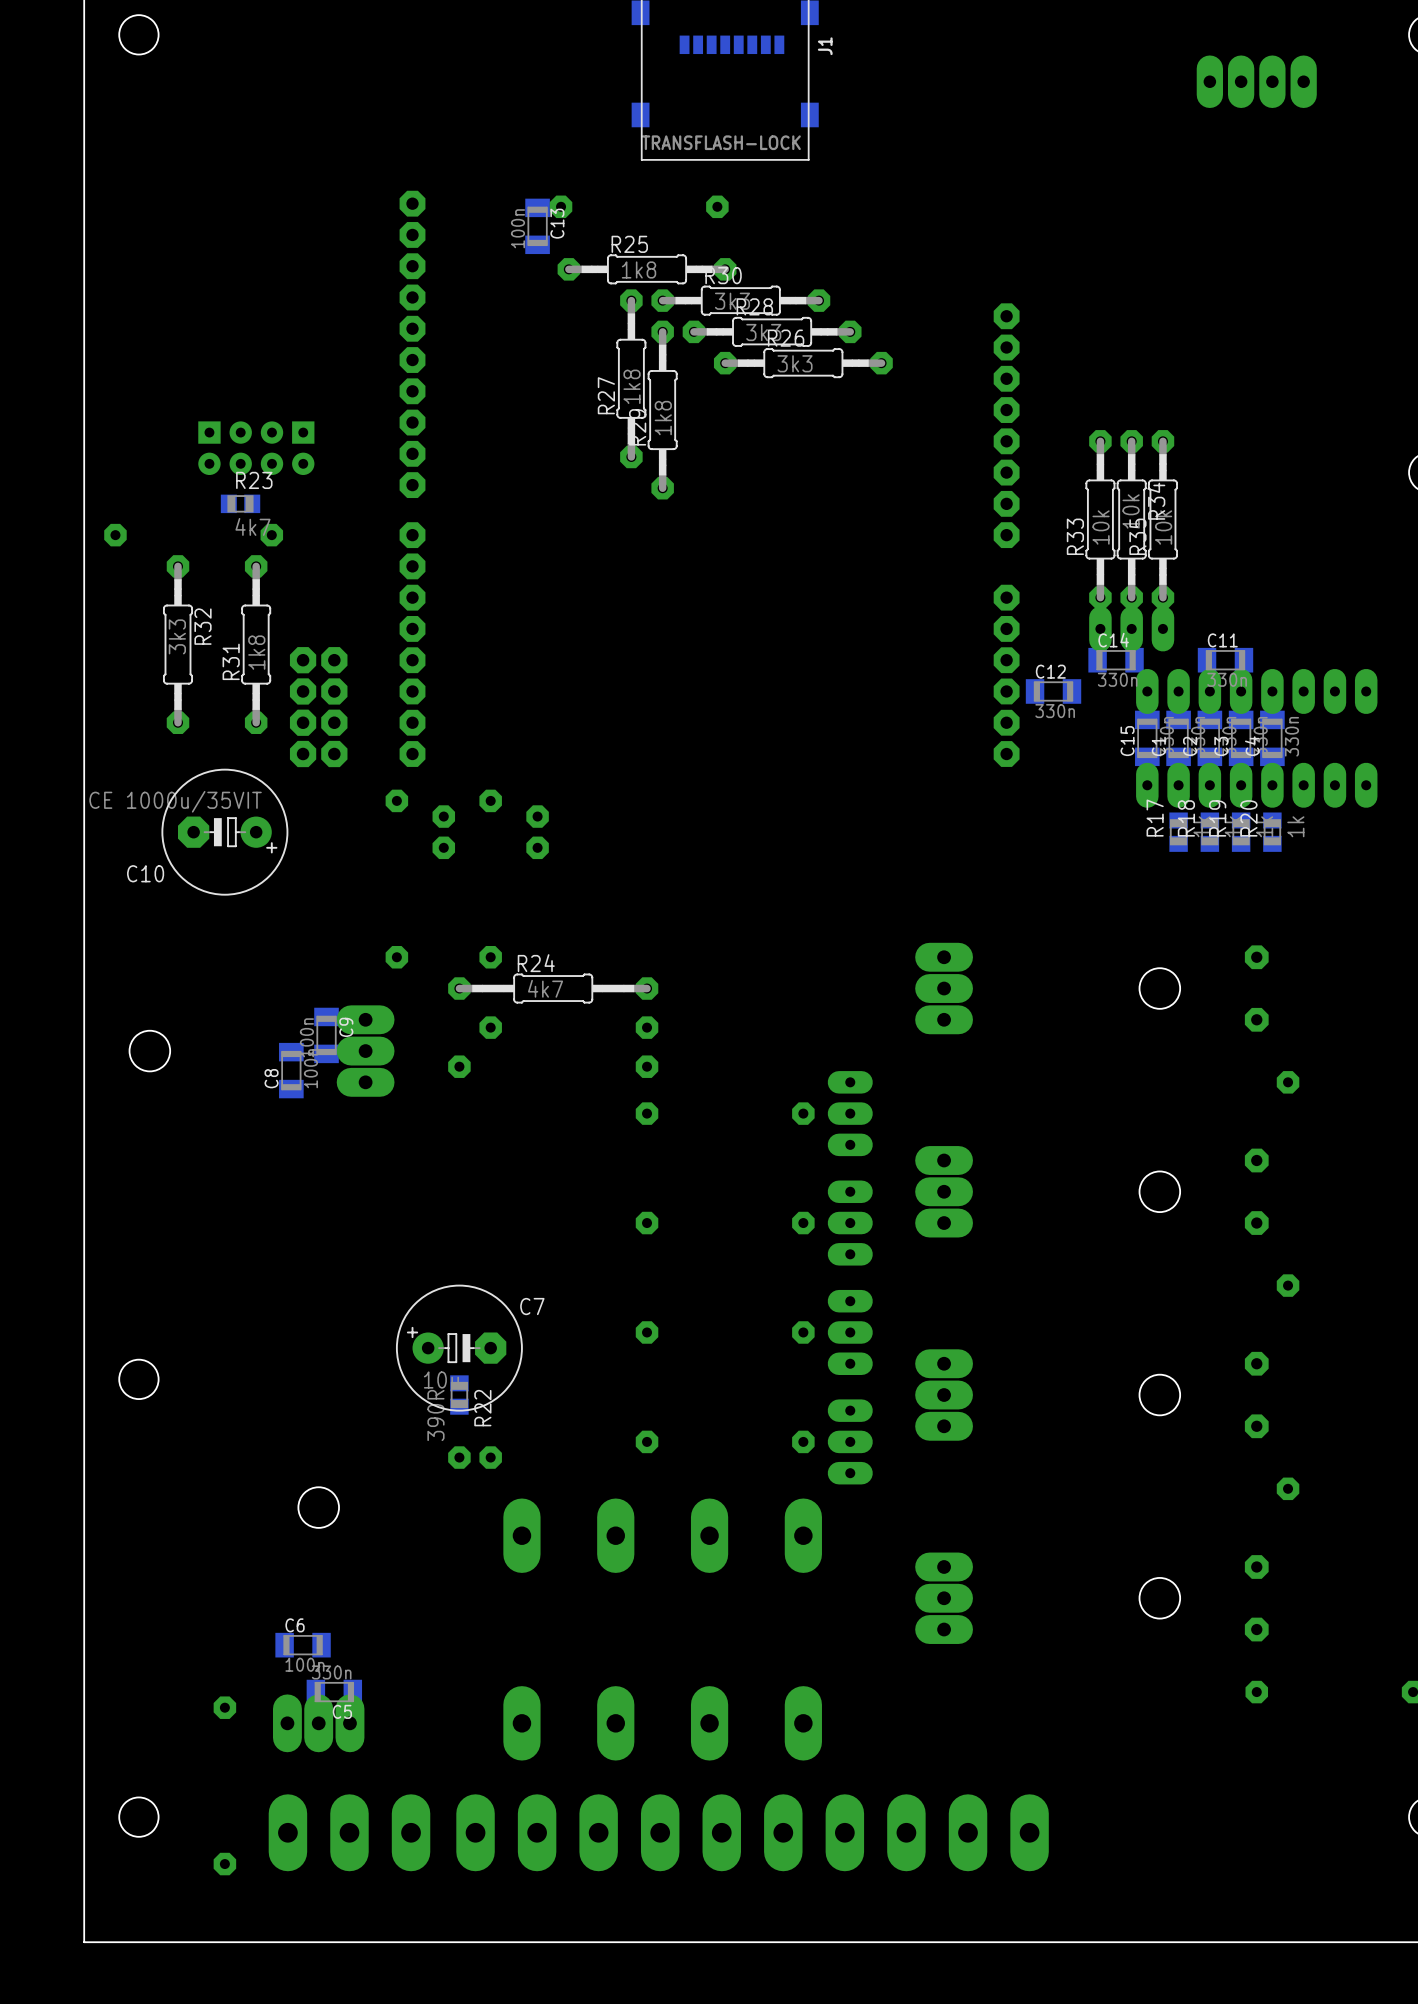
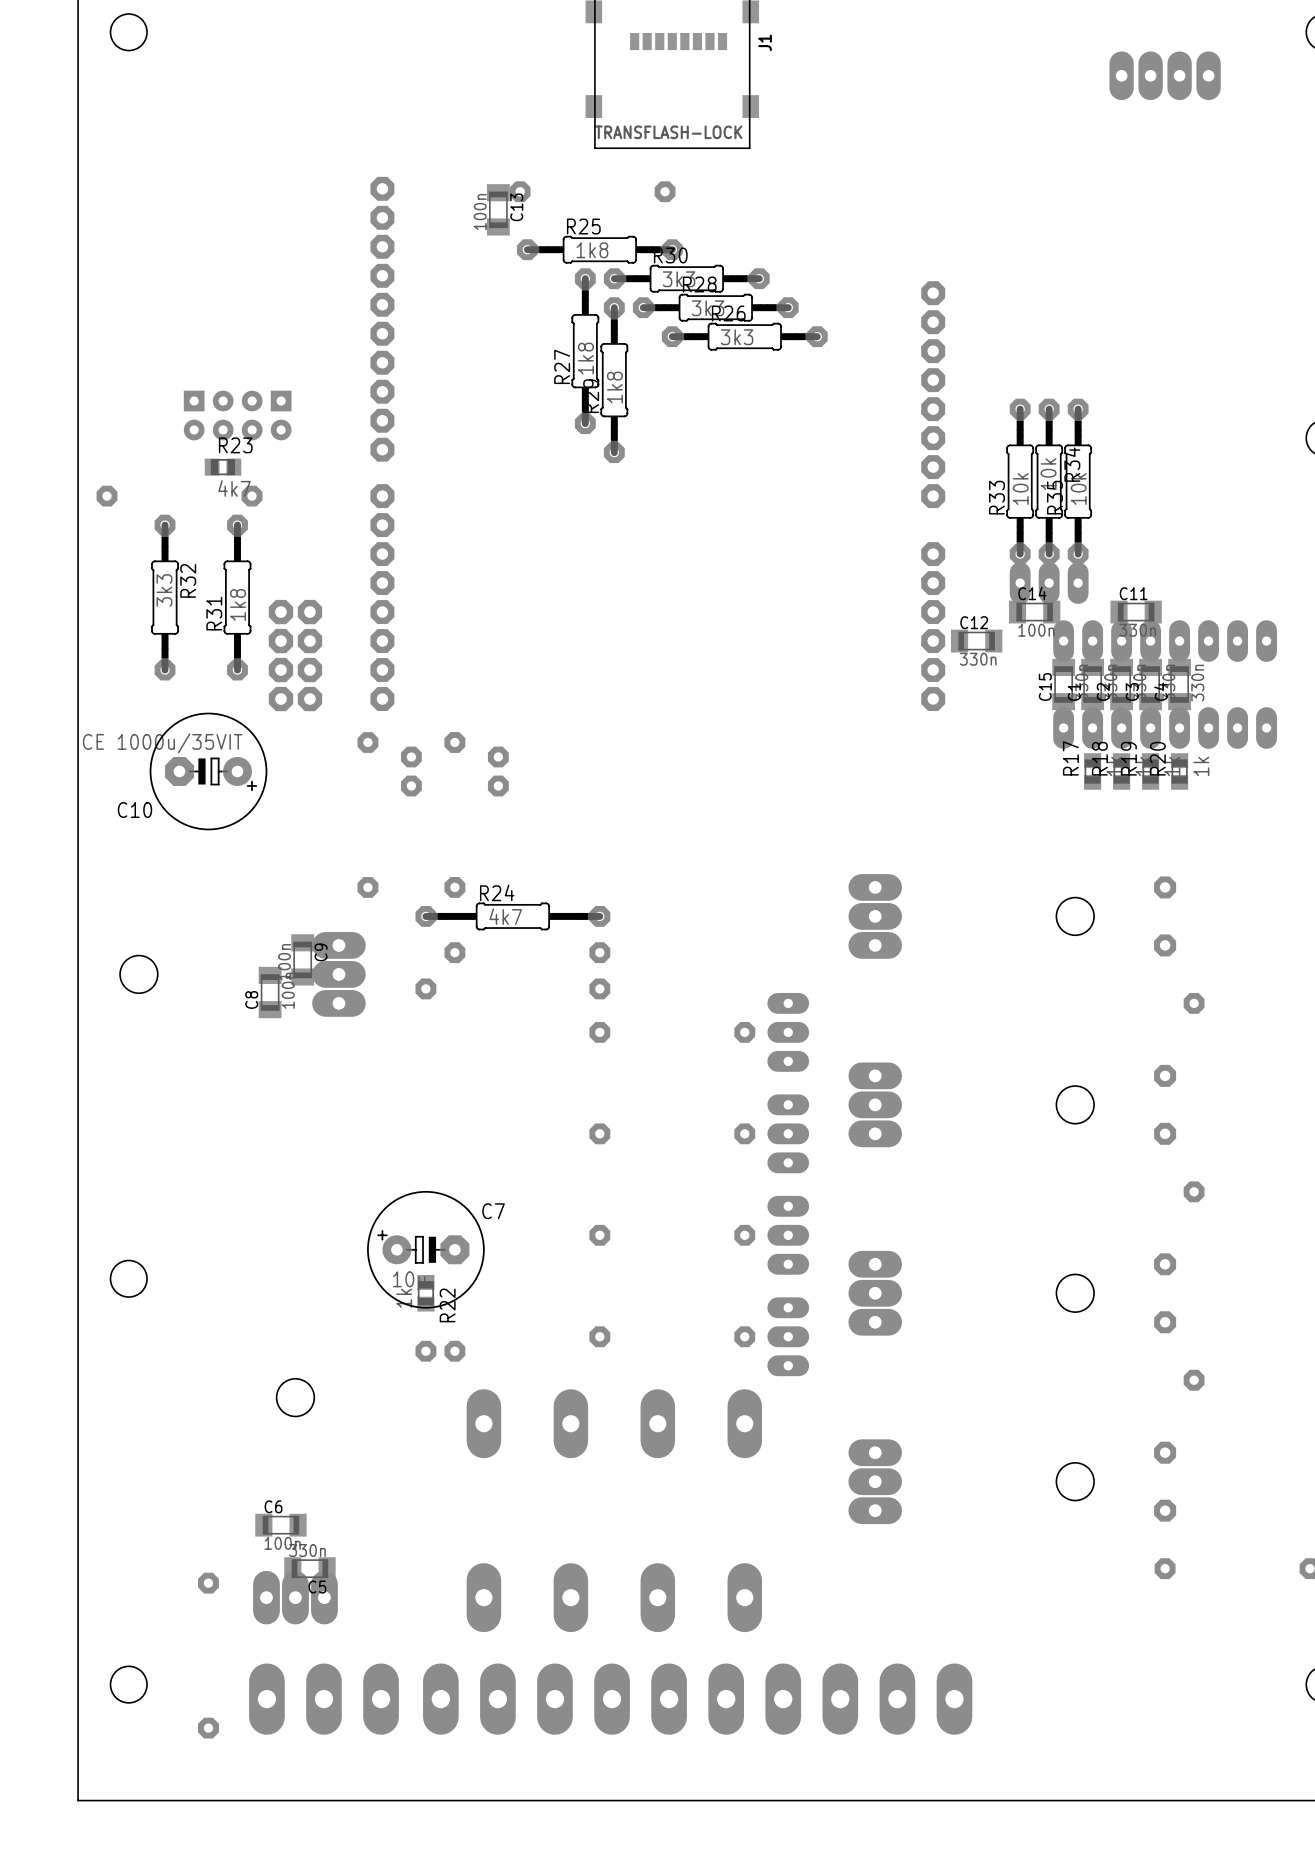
C14 value: 330n (1117, 679) -> 100n (1036, 630)
R22 value: 390R (435, 1415) -> 1k (404, 1298)

